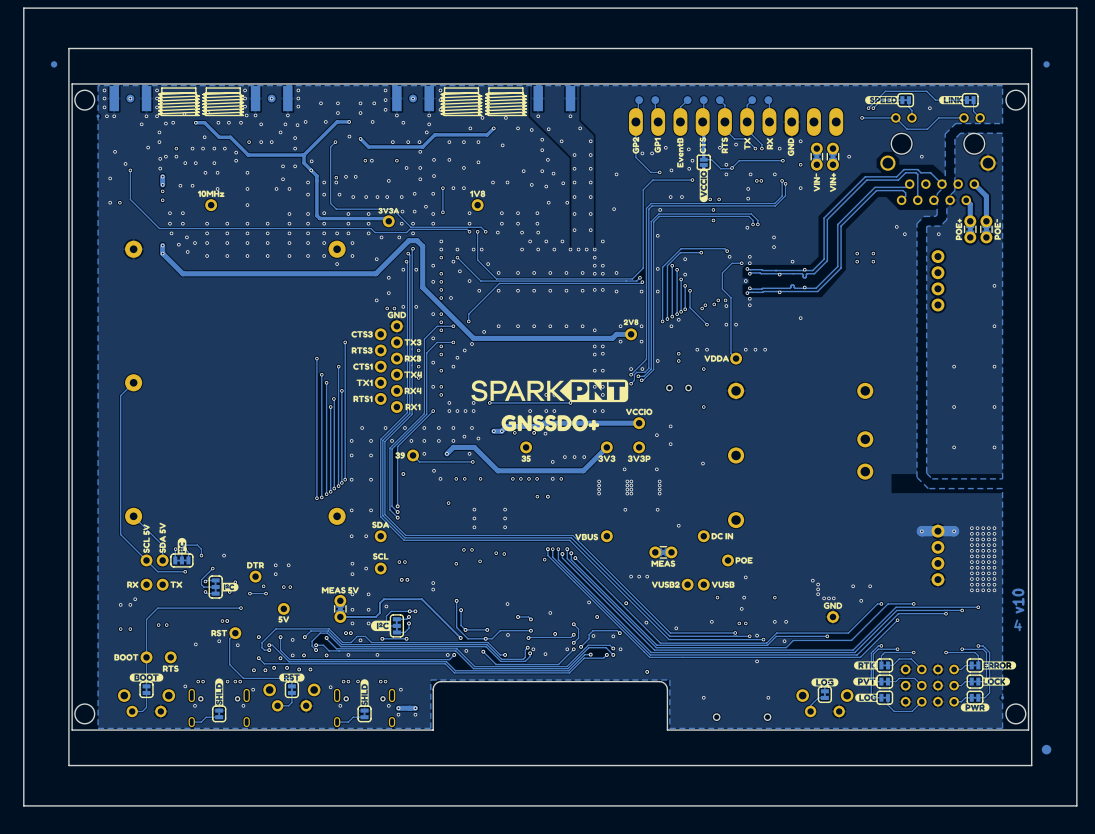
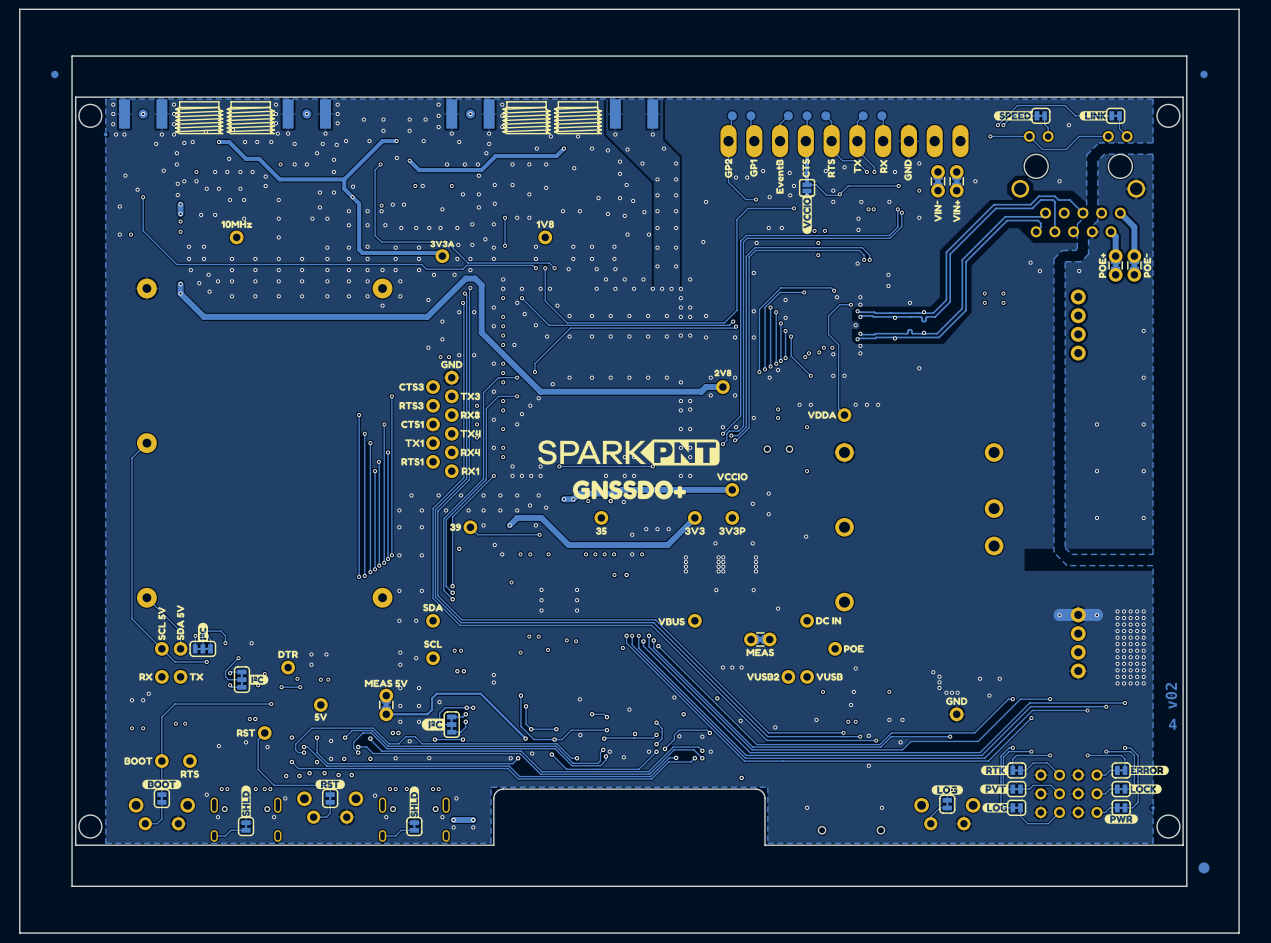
text: v10 (1018, 601) -> v02 (1171, 695)

